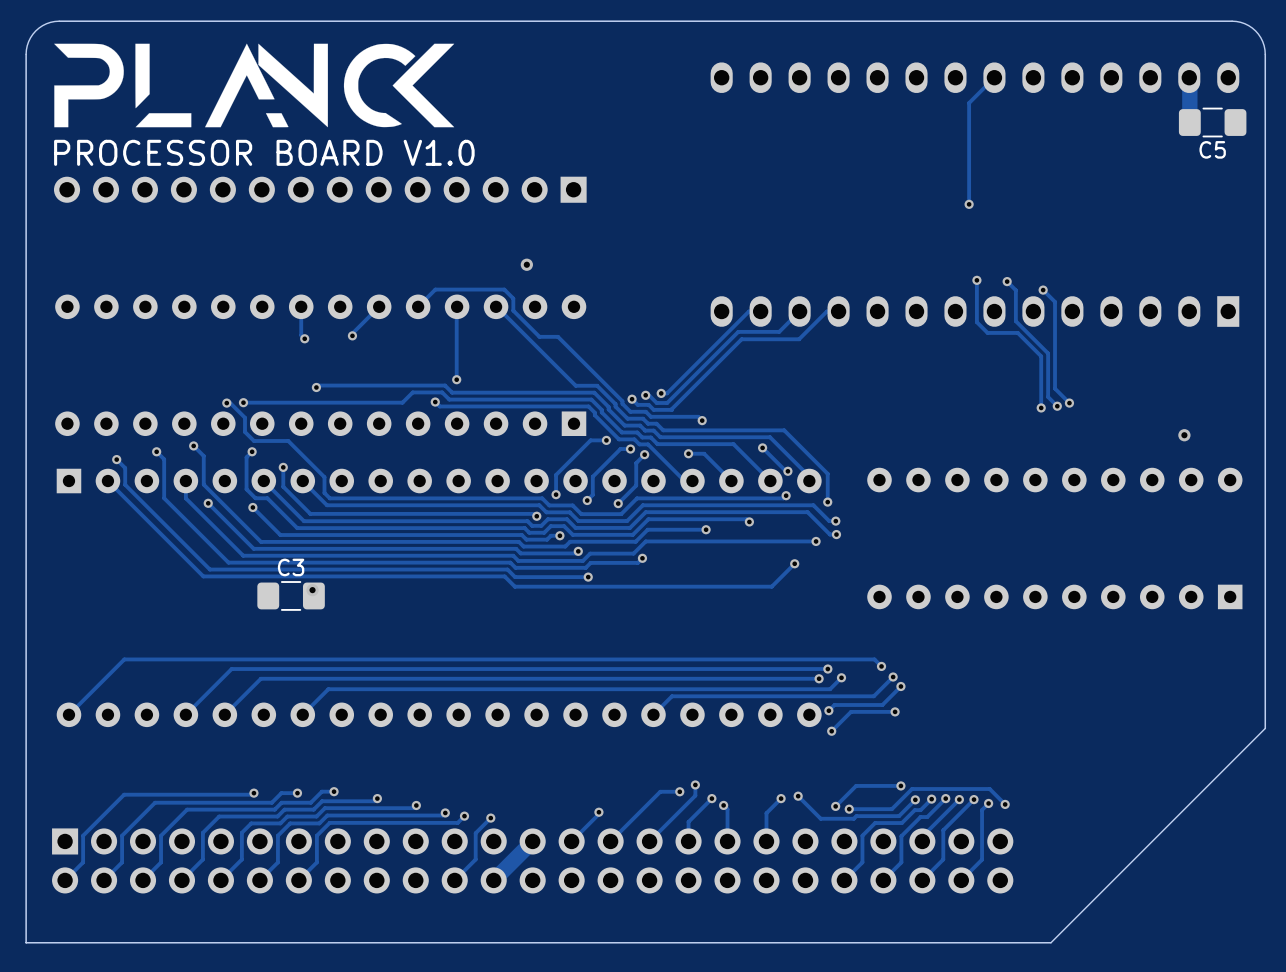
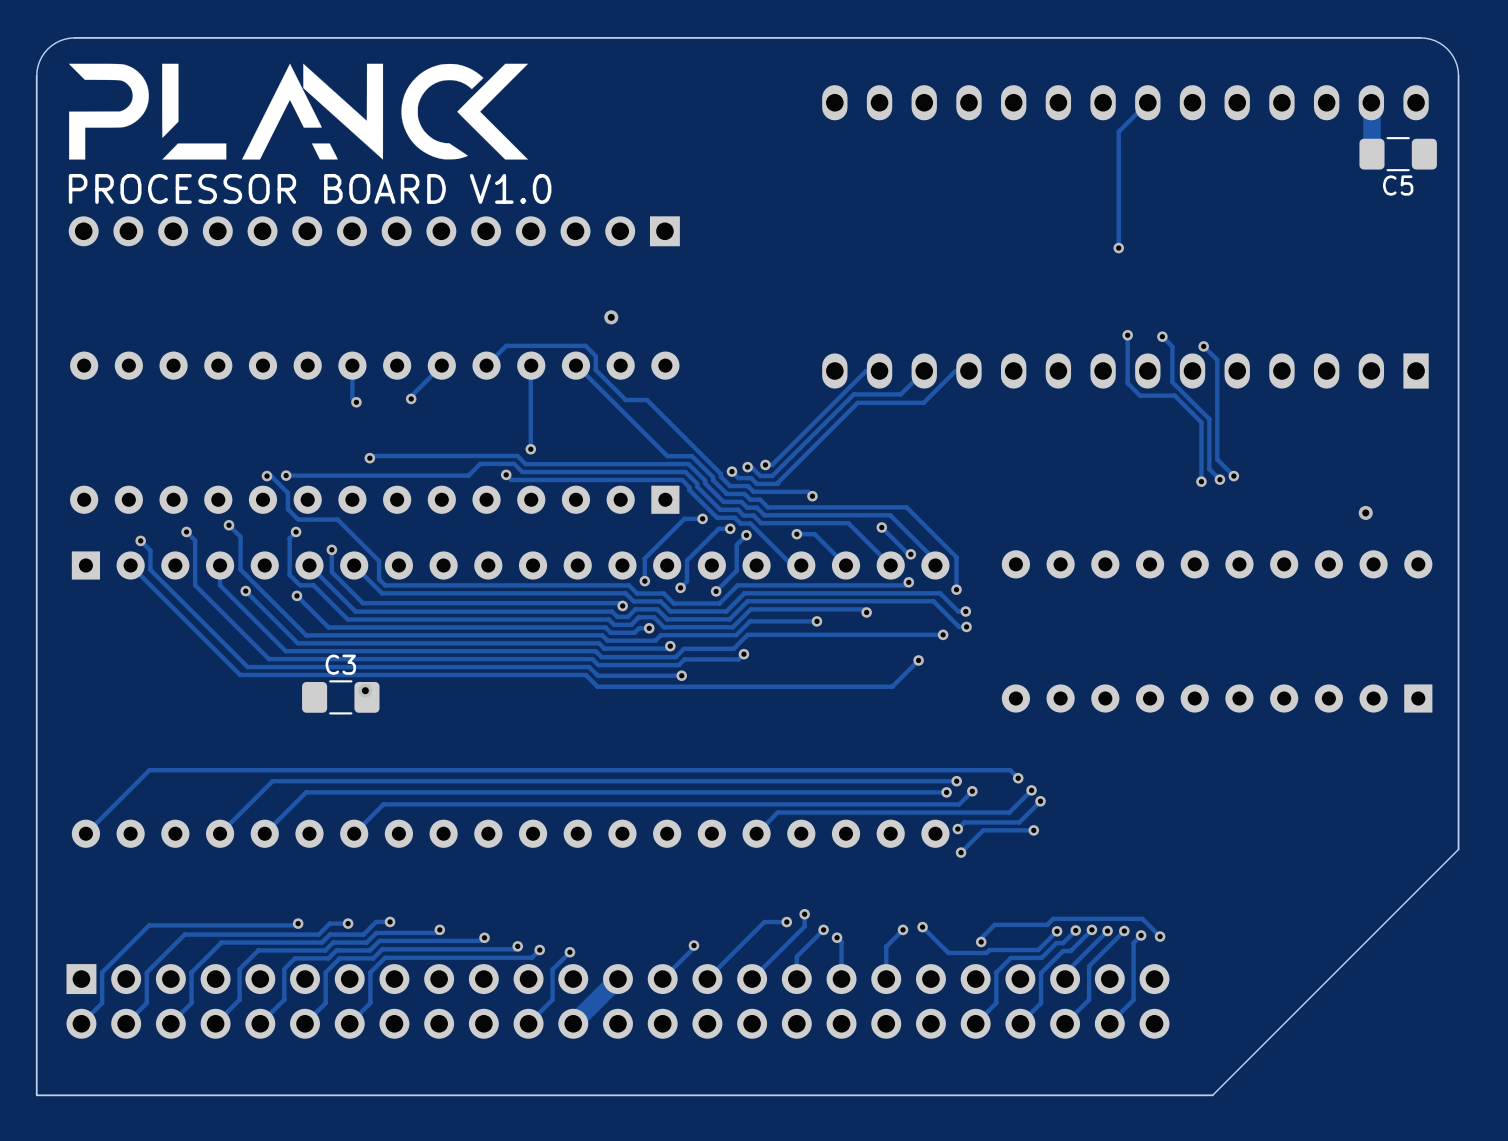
track: (900, 785) (856, 785) (835, 806) -> none
via: (900, 785) -> none
track: (906, 794) (891, 809) (849, 809) -> (1047, 924) (994, 924) (980, 938)
via: (835, 806) -> none

